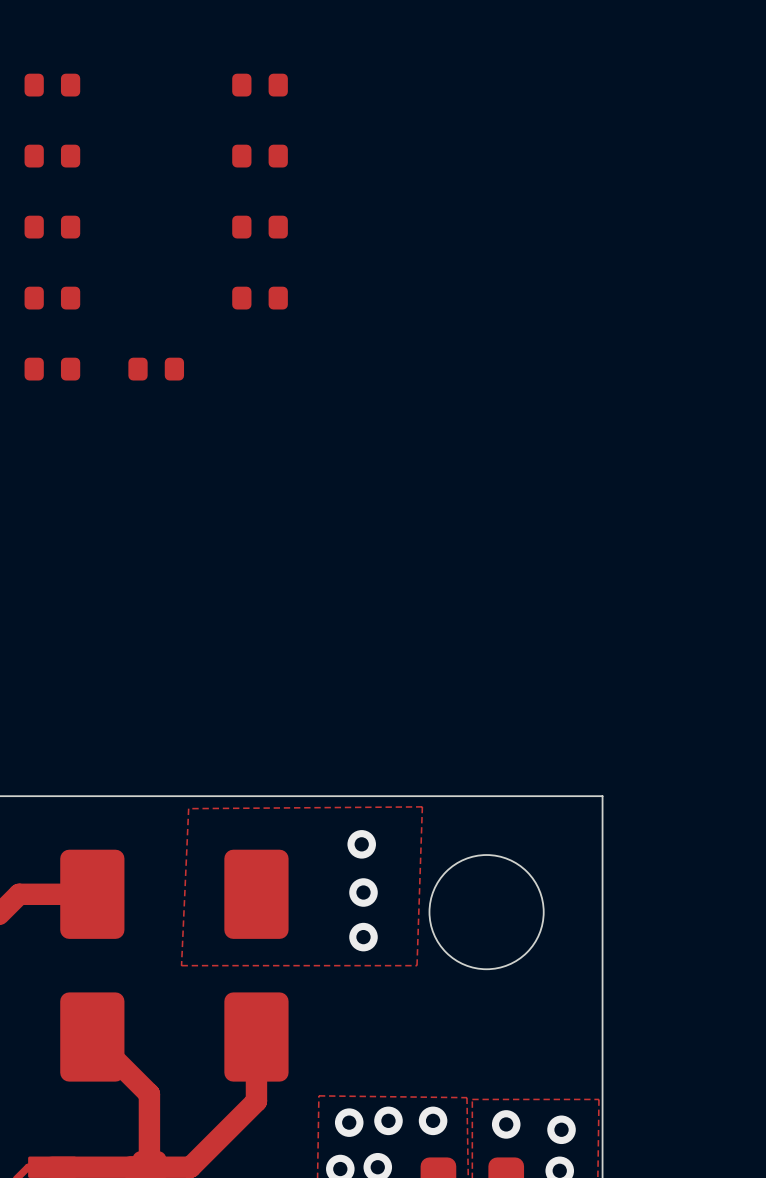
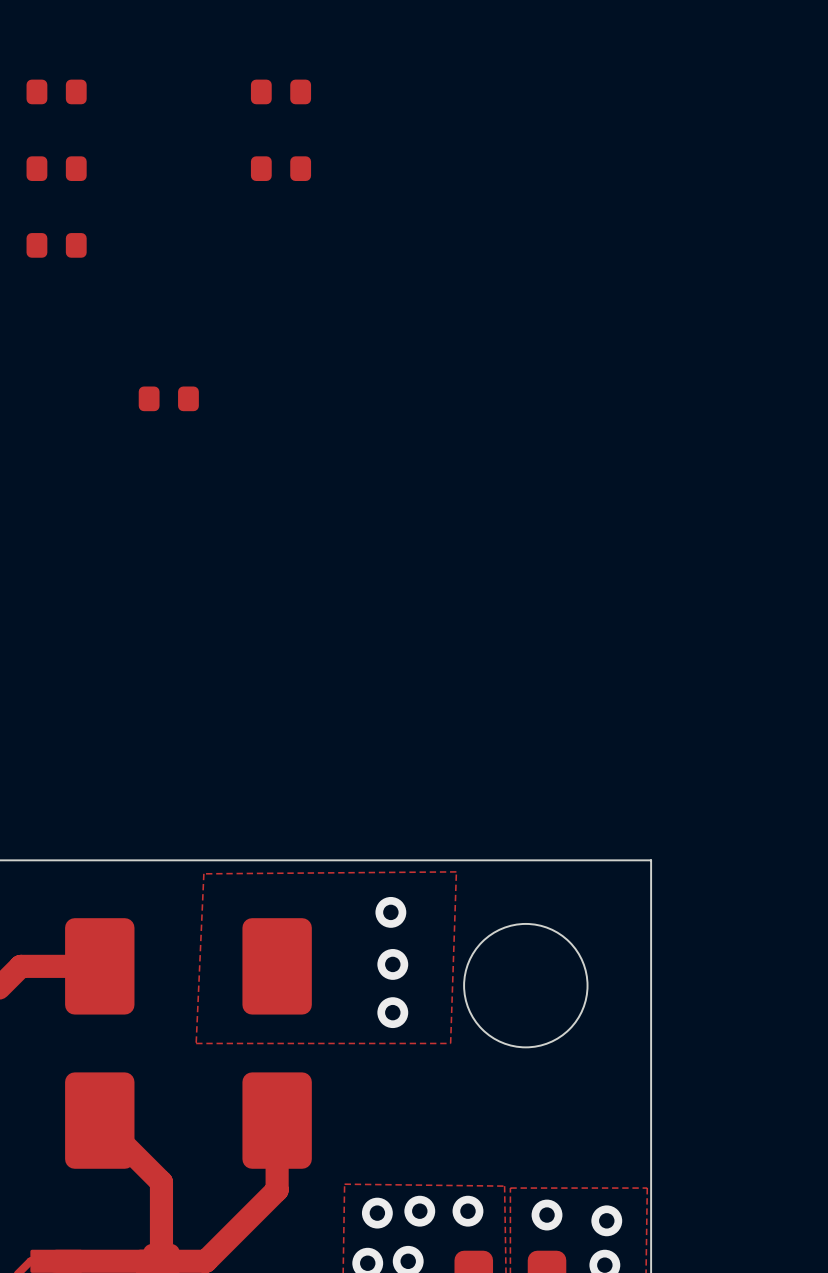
part: (260, 227) -> none
part: (52, 298) -> none
part: (260, 298) -> none
part: (52, 369) -> none

